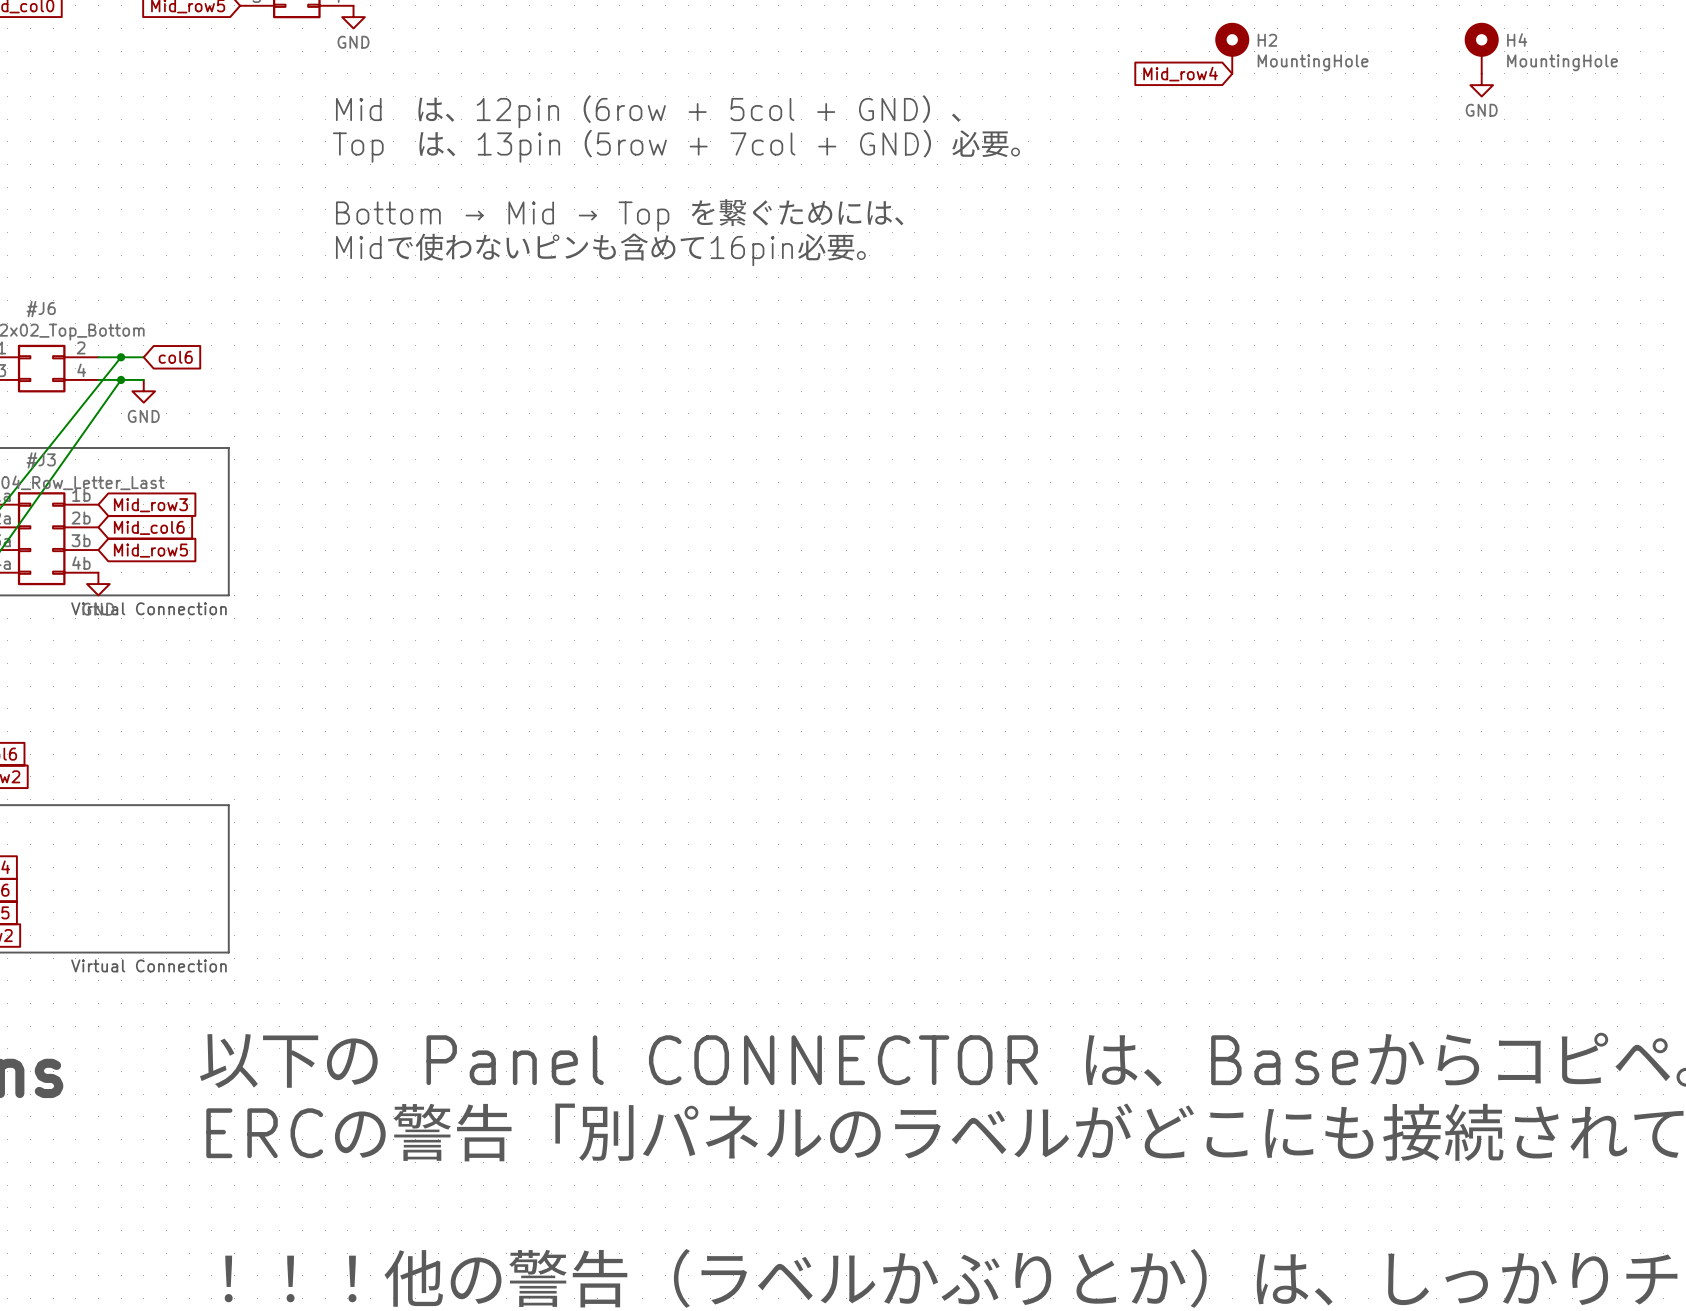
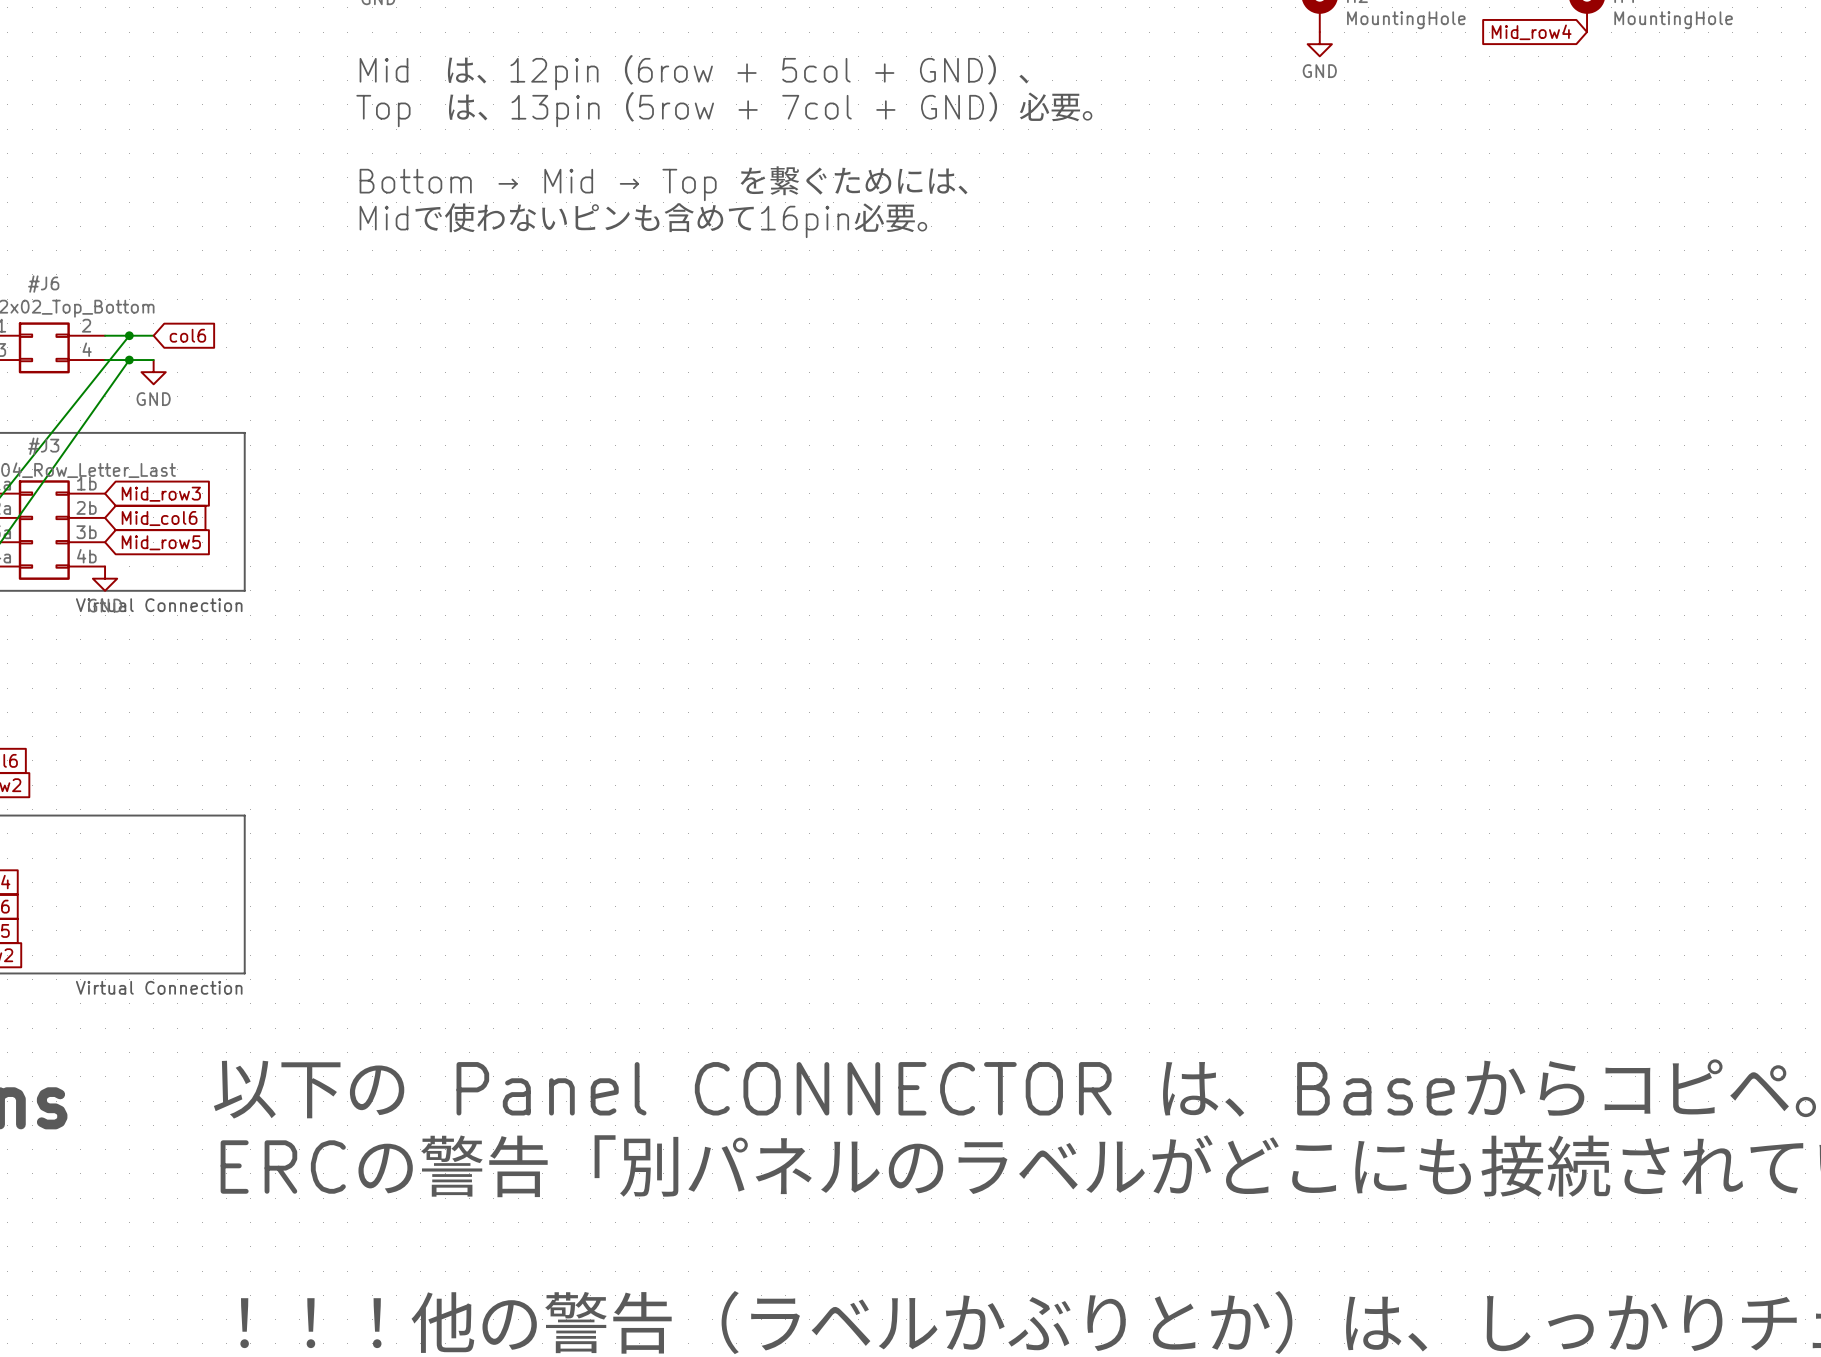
global label: Mid_row4 (1180, 74) -> none
global label: none -> Mid_row4 (1531, 32)
power symbol: none -> GND (1319, 44)
power symbol: GND (1481, 85) -> none

